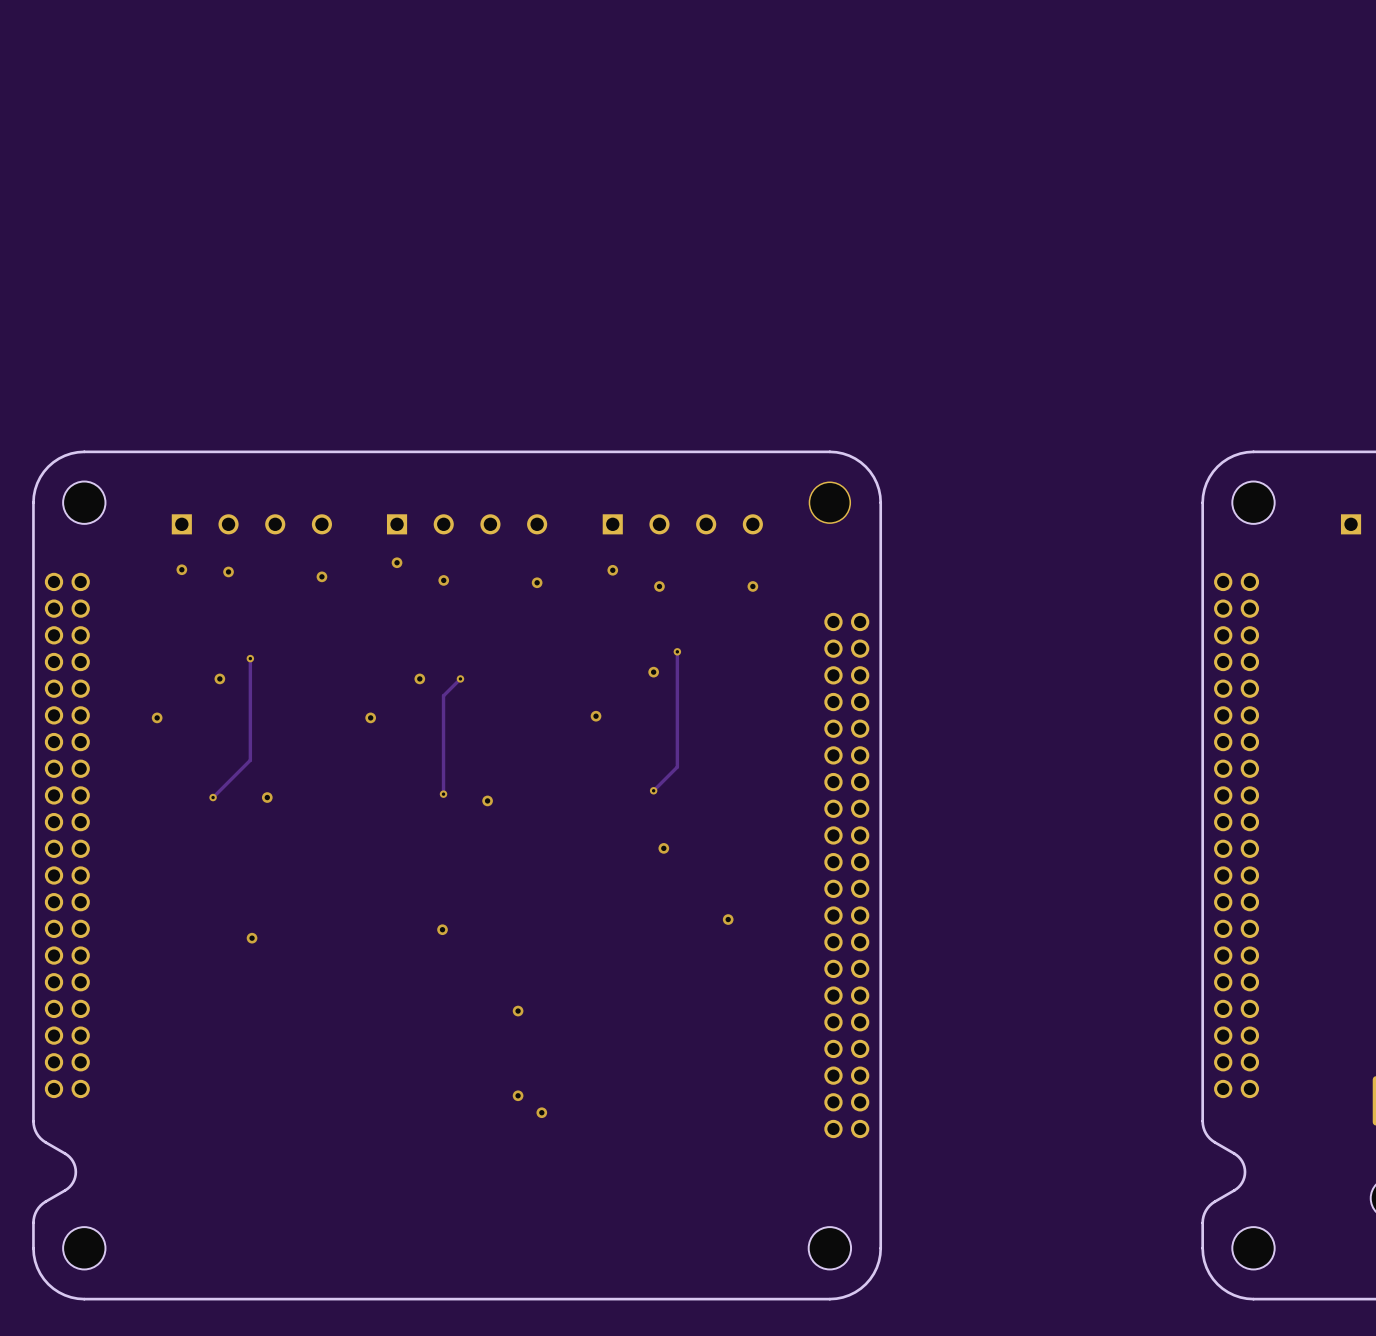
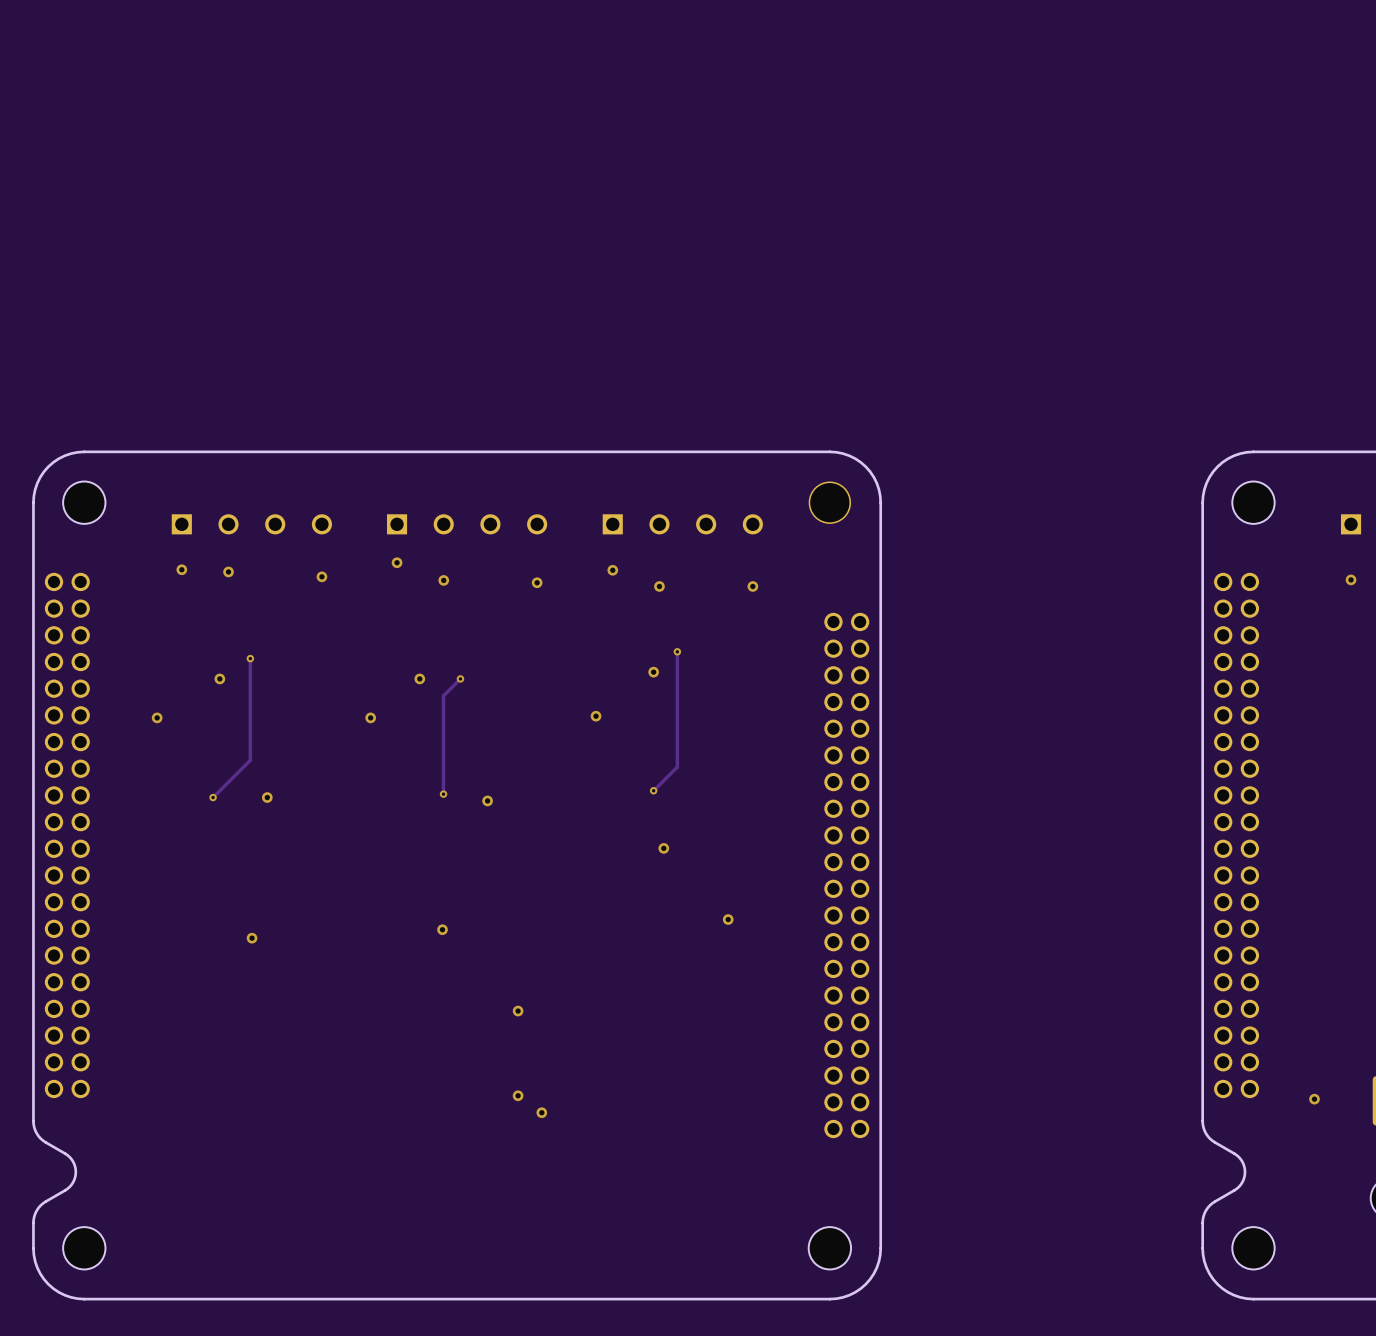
via: none -> (1351, 579)
via: none -> (1314, 1099)

